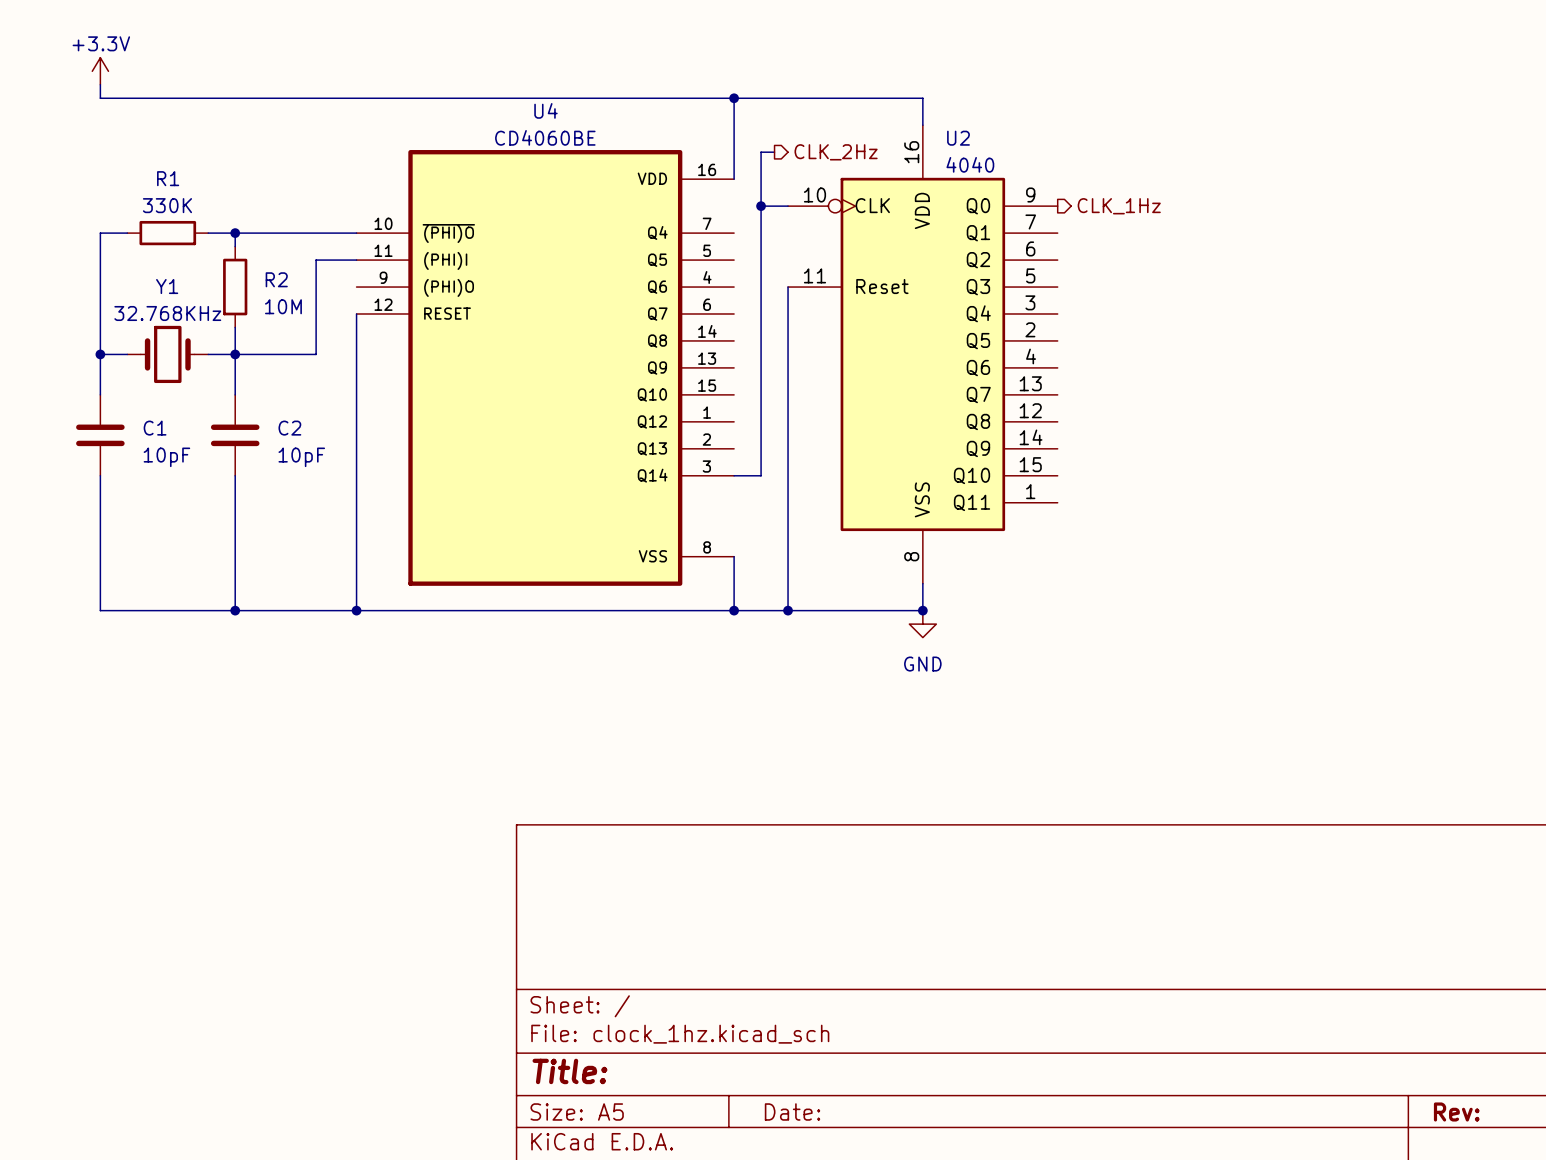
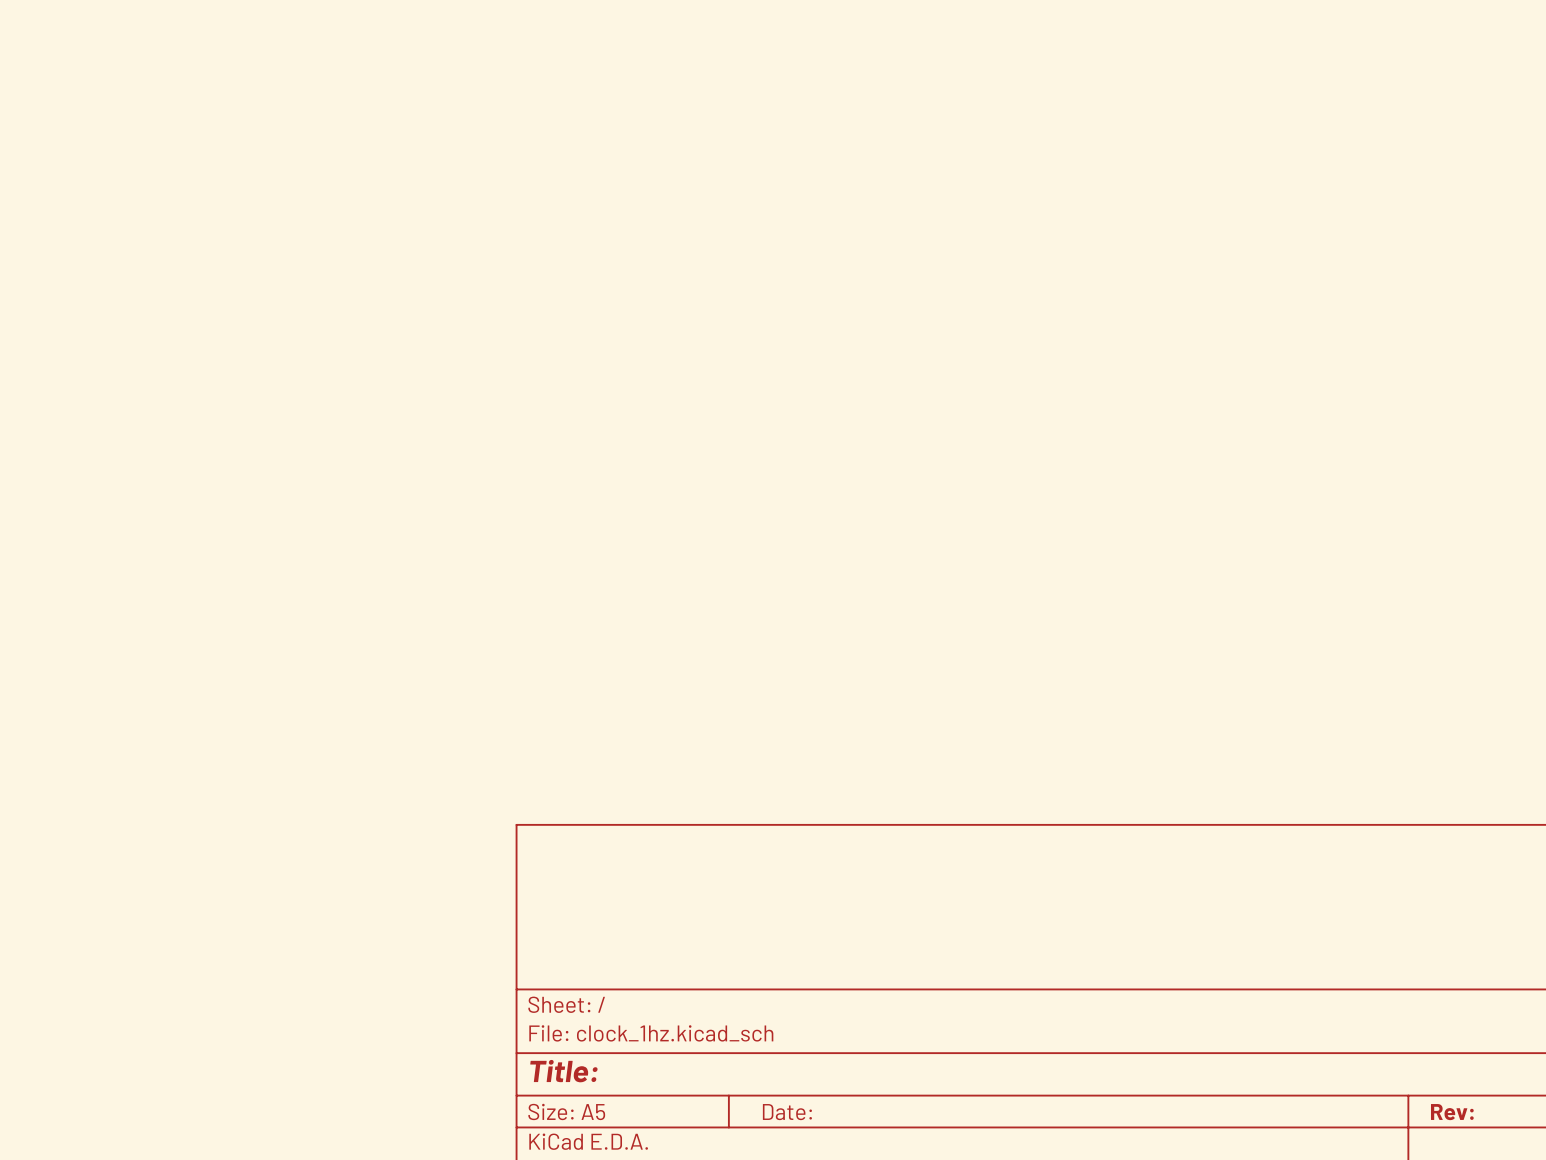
power symbol: +3.3V (100, 71) -> none
wire: (100, 84) (100, 98) (922, 98) (922, 125) -> none
wire: (734, 98) (734, 179) -> none
junction: (734, 98) -> none
wire: (774, 152) (761, 152) (761, 475) (734, 475) -> none
hierarchical label: CLK_2Hz (836, 152) -> none
wire: (761, 206) (788, 206) -> none
junction: (761, 206) -> none
hierarchical label: CLK_1Hz (1119, 206) -> none
wire: (127, 233) (100, 233) (100, 394) -> none
R1: 330K (167, 233) -> none
wire: (208, 233) (356, 233) -> none
wire: (235, 233) (235, 246) -> none
junction: (235, 233) -> none
wire: (356, 260) (316, 260) (316, 354) (208, 354) -> none
R2: 10M (235, 287) -> none
wire: (788, 287) (788, 610) -> none
wire: (356, 313) (356, 610) -> none
wire: (235, 327) (235, 394) -> none
wire: (100, 354) (127, 354) -> none
junction: (100, 354) -> none
Y1: 32.768KHz (167, 354) -> none
junction: (235, 354) -> none
U2: 4040 (922, 354) -> none
U4: CD4060BE (545, 367) -> none
C1: 10pF (100, 435) -> none
C2: 10pF (235, 435) -> none
wire: (100, 475) (100, 610) (922, 610) (922, 583) -> none
wire: (235, 475) (235, 610) -> none
wire: (734, 556) (734, 610) -> none
junction: (235, 610) -> none
junction: (356, 610) -> none
junction: (734, 610) -> none
junction: (788, 610) -> none
junction: (922, 610) -> none
power symbol: GND (922, 624) -> none

